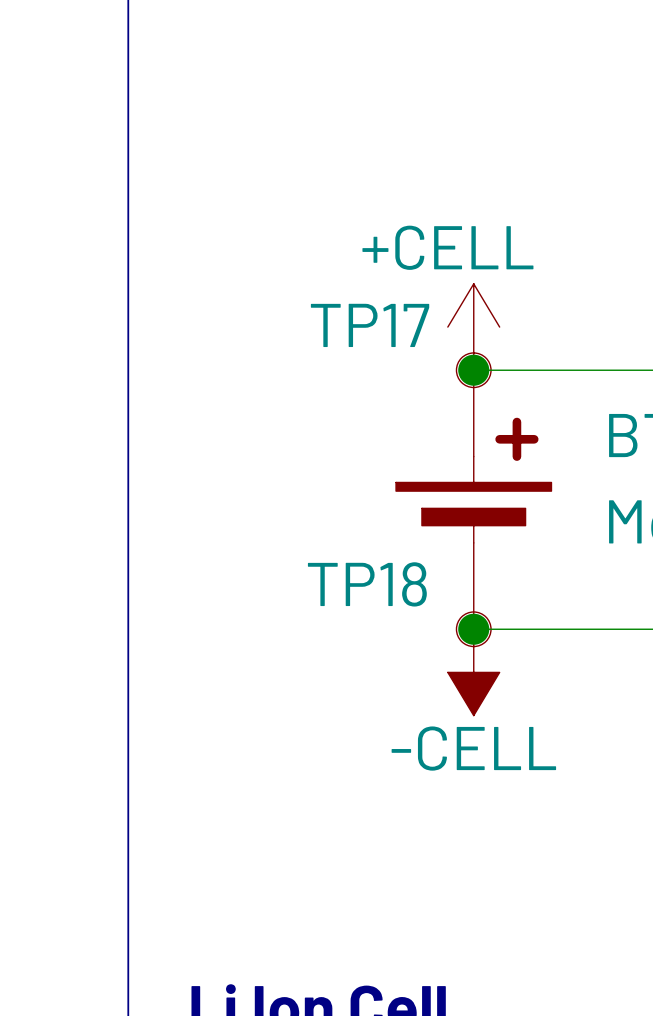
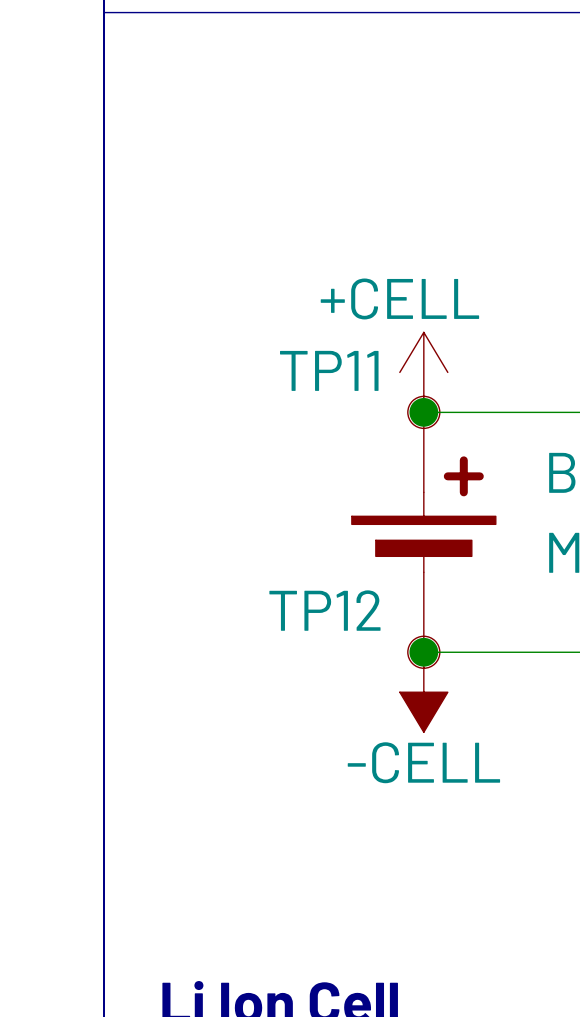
TP17 name: TP17 (370, 325) -> TP11 (329, 370)
TP18 name: TP18 (367, 584) -> TP12 (324, 610)

